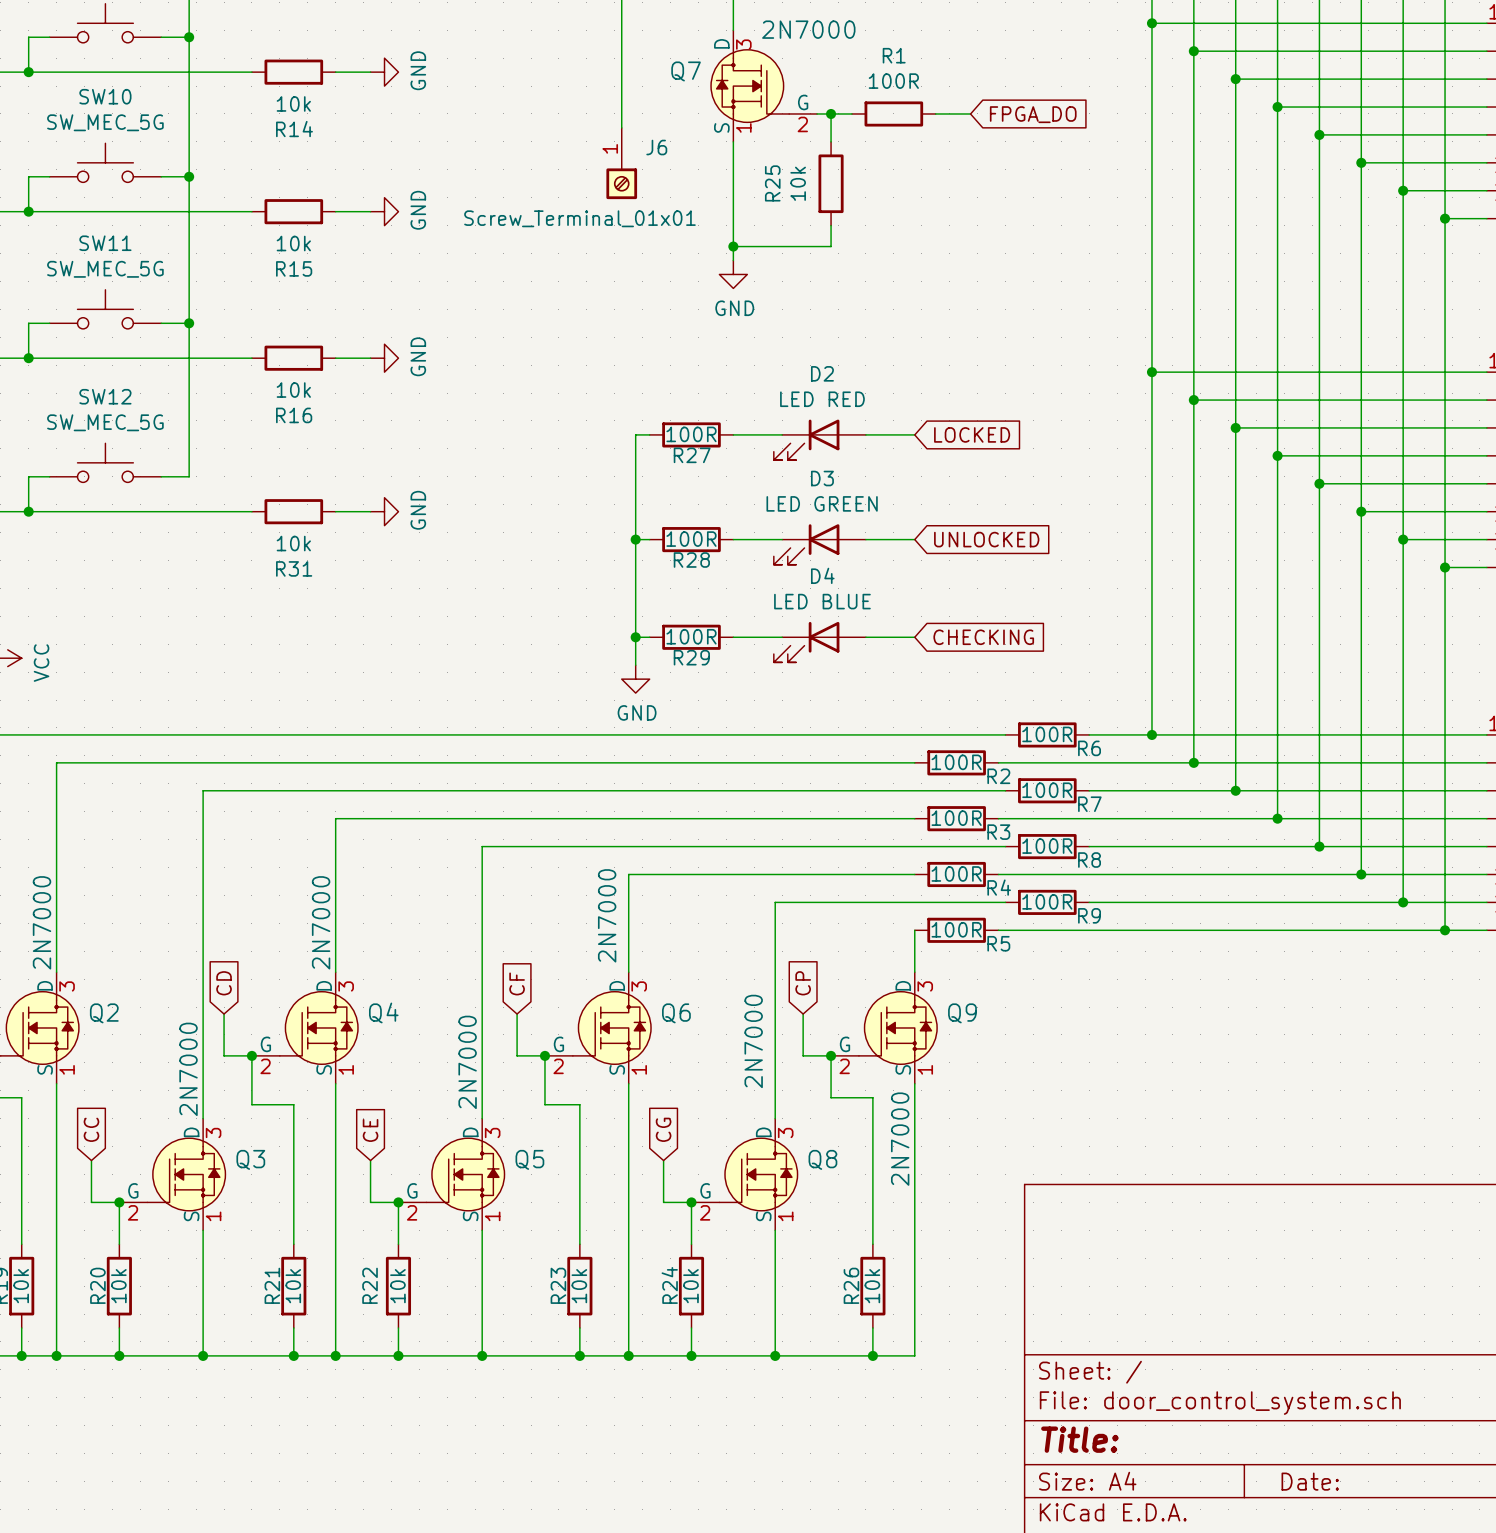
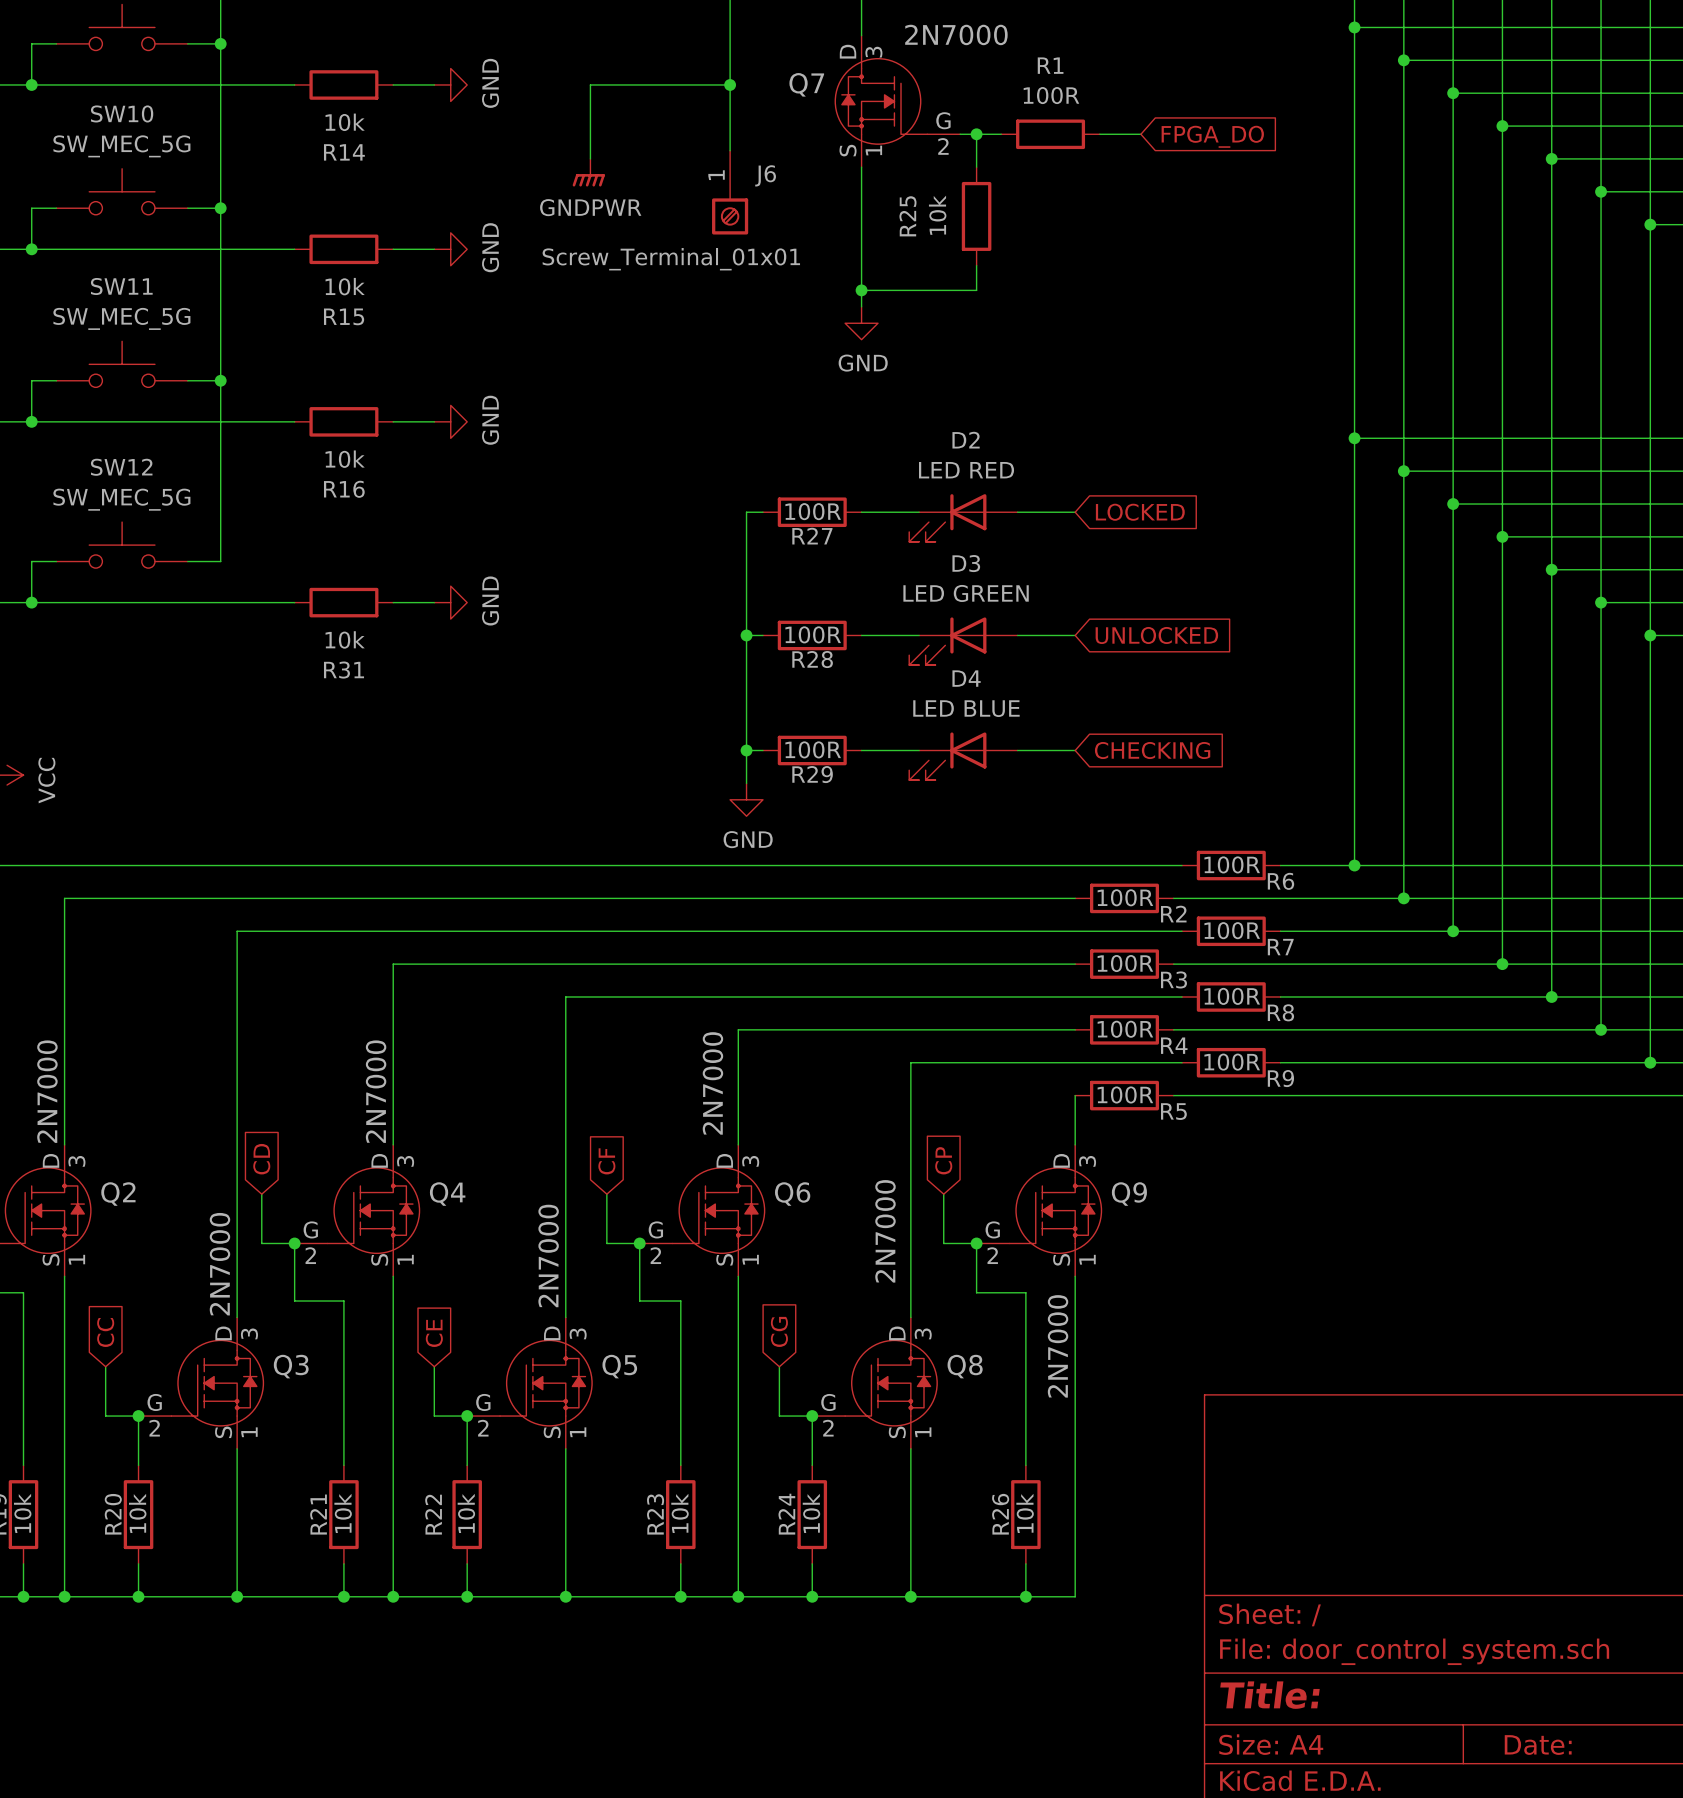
wire: none -> (730, 84) (590, 84) (590, 158)
junction: none -> (730, 84)
power symbol: none -> GNDPWR (588, 172)

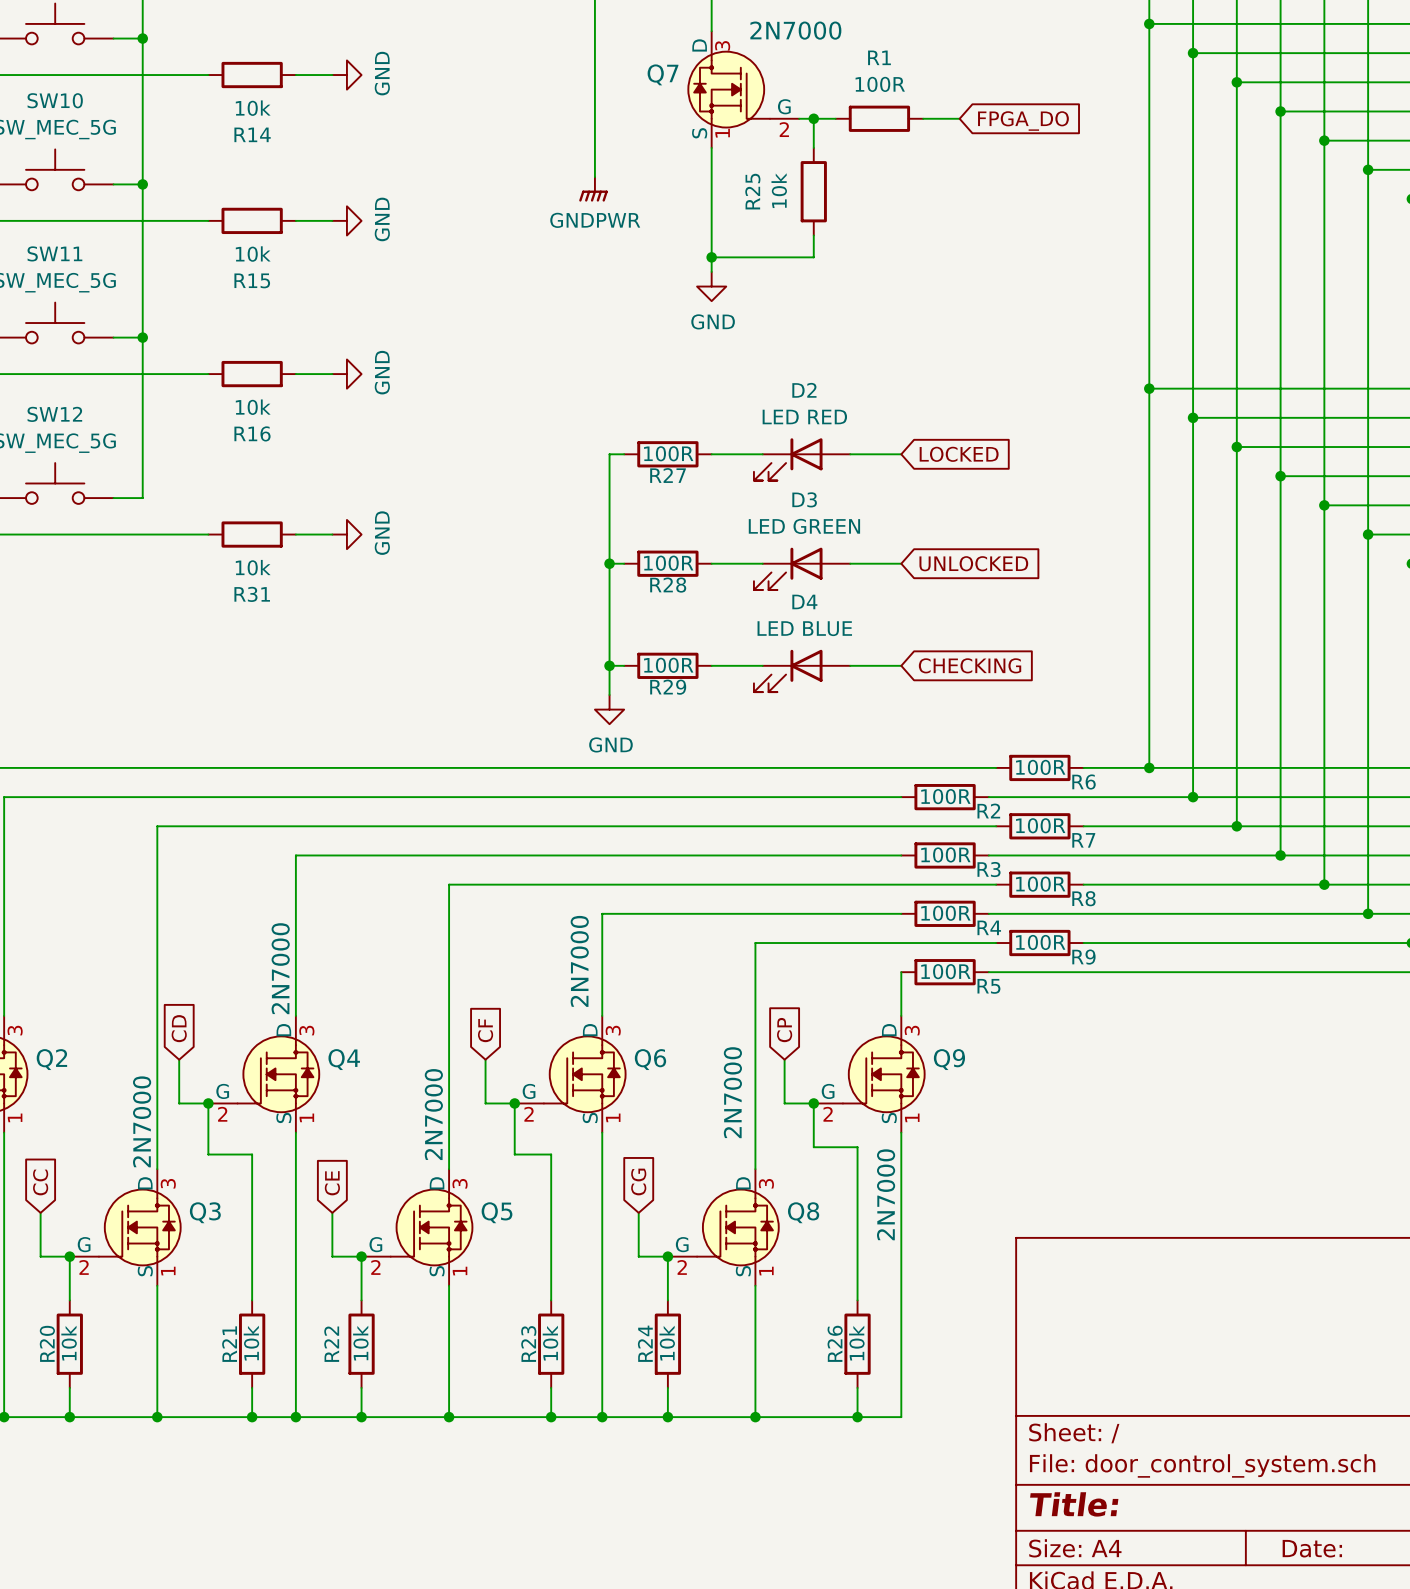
wire: (730, 84) (590, 84) (590, 158) -> none
junction: (730, 84) -> none
power symbol position: GNDPWR (588, 172) -> GNDPWR (593, 189)
J6: Screw_Terminal_01x01 (730, 192) -> none

